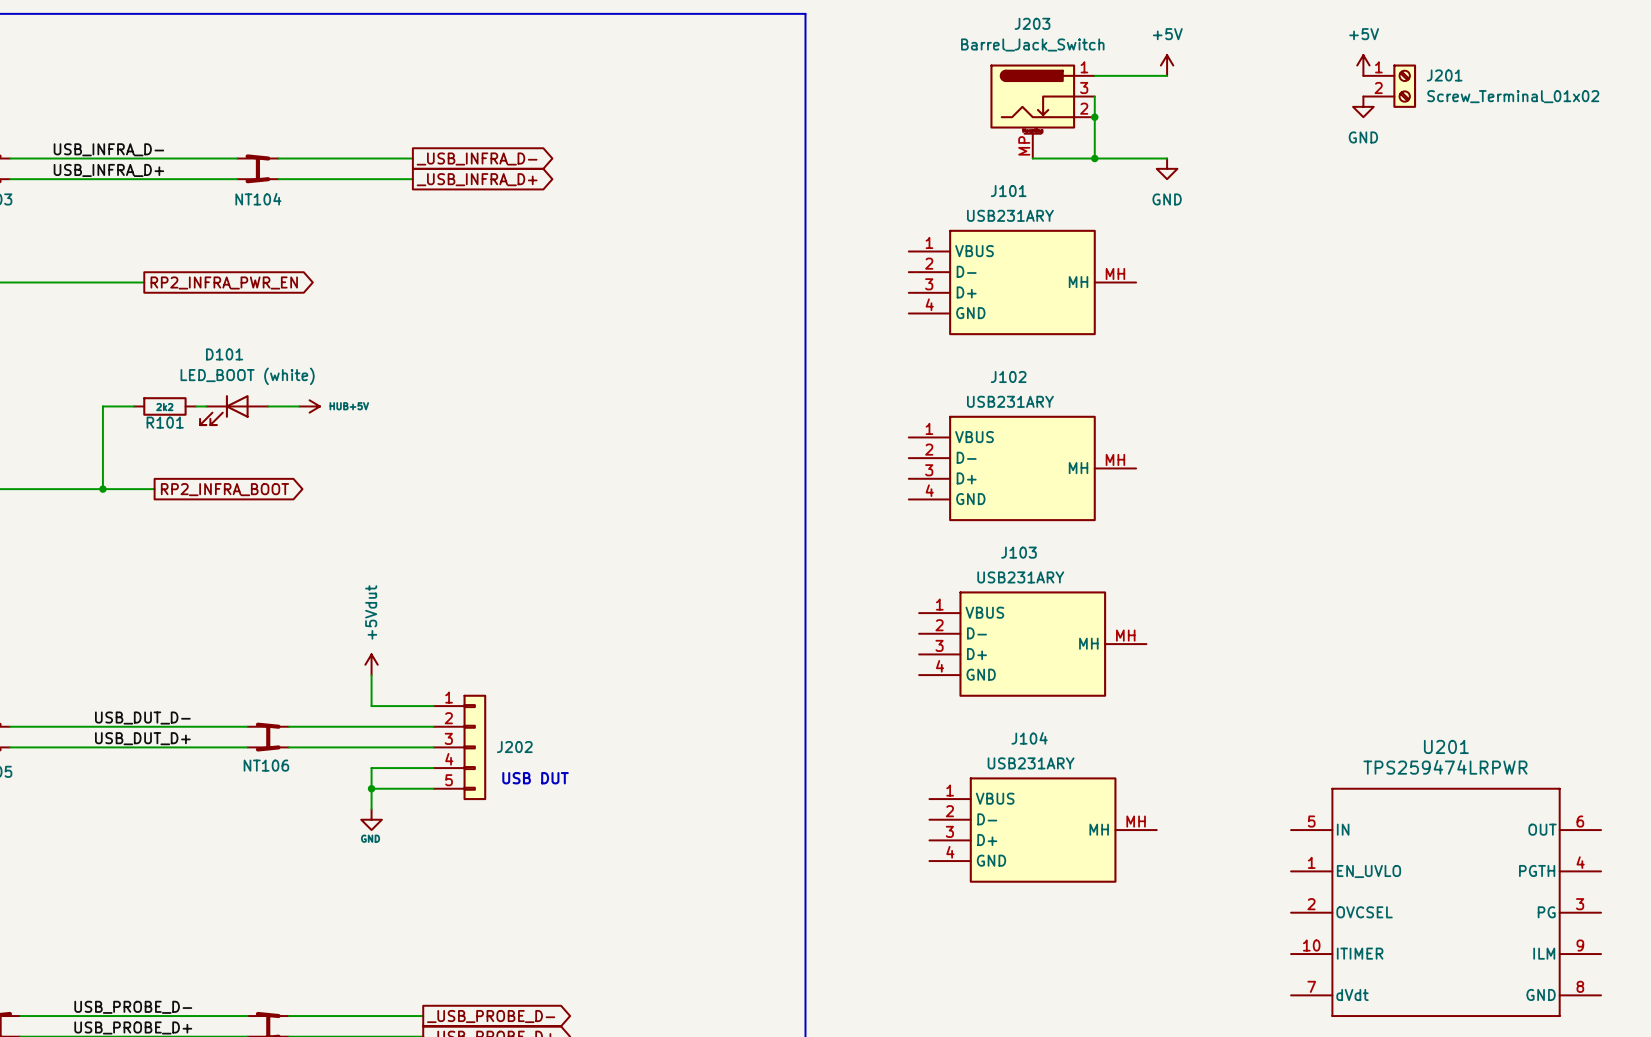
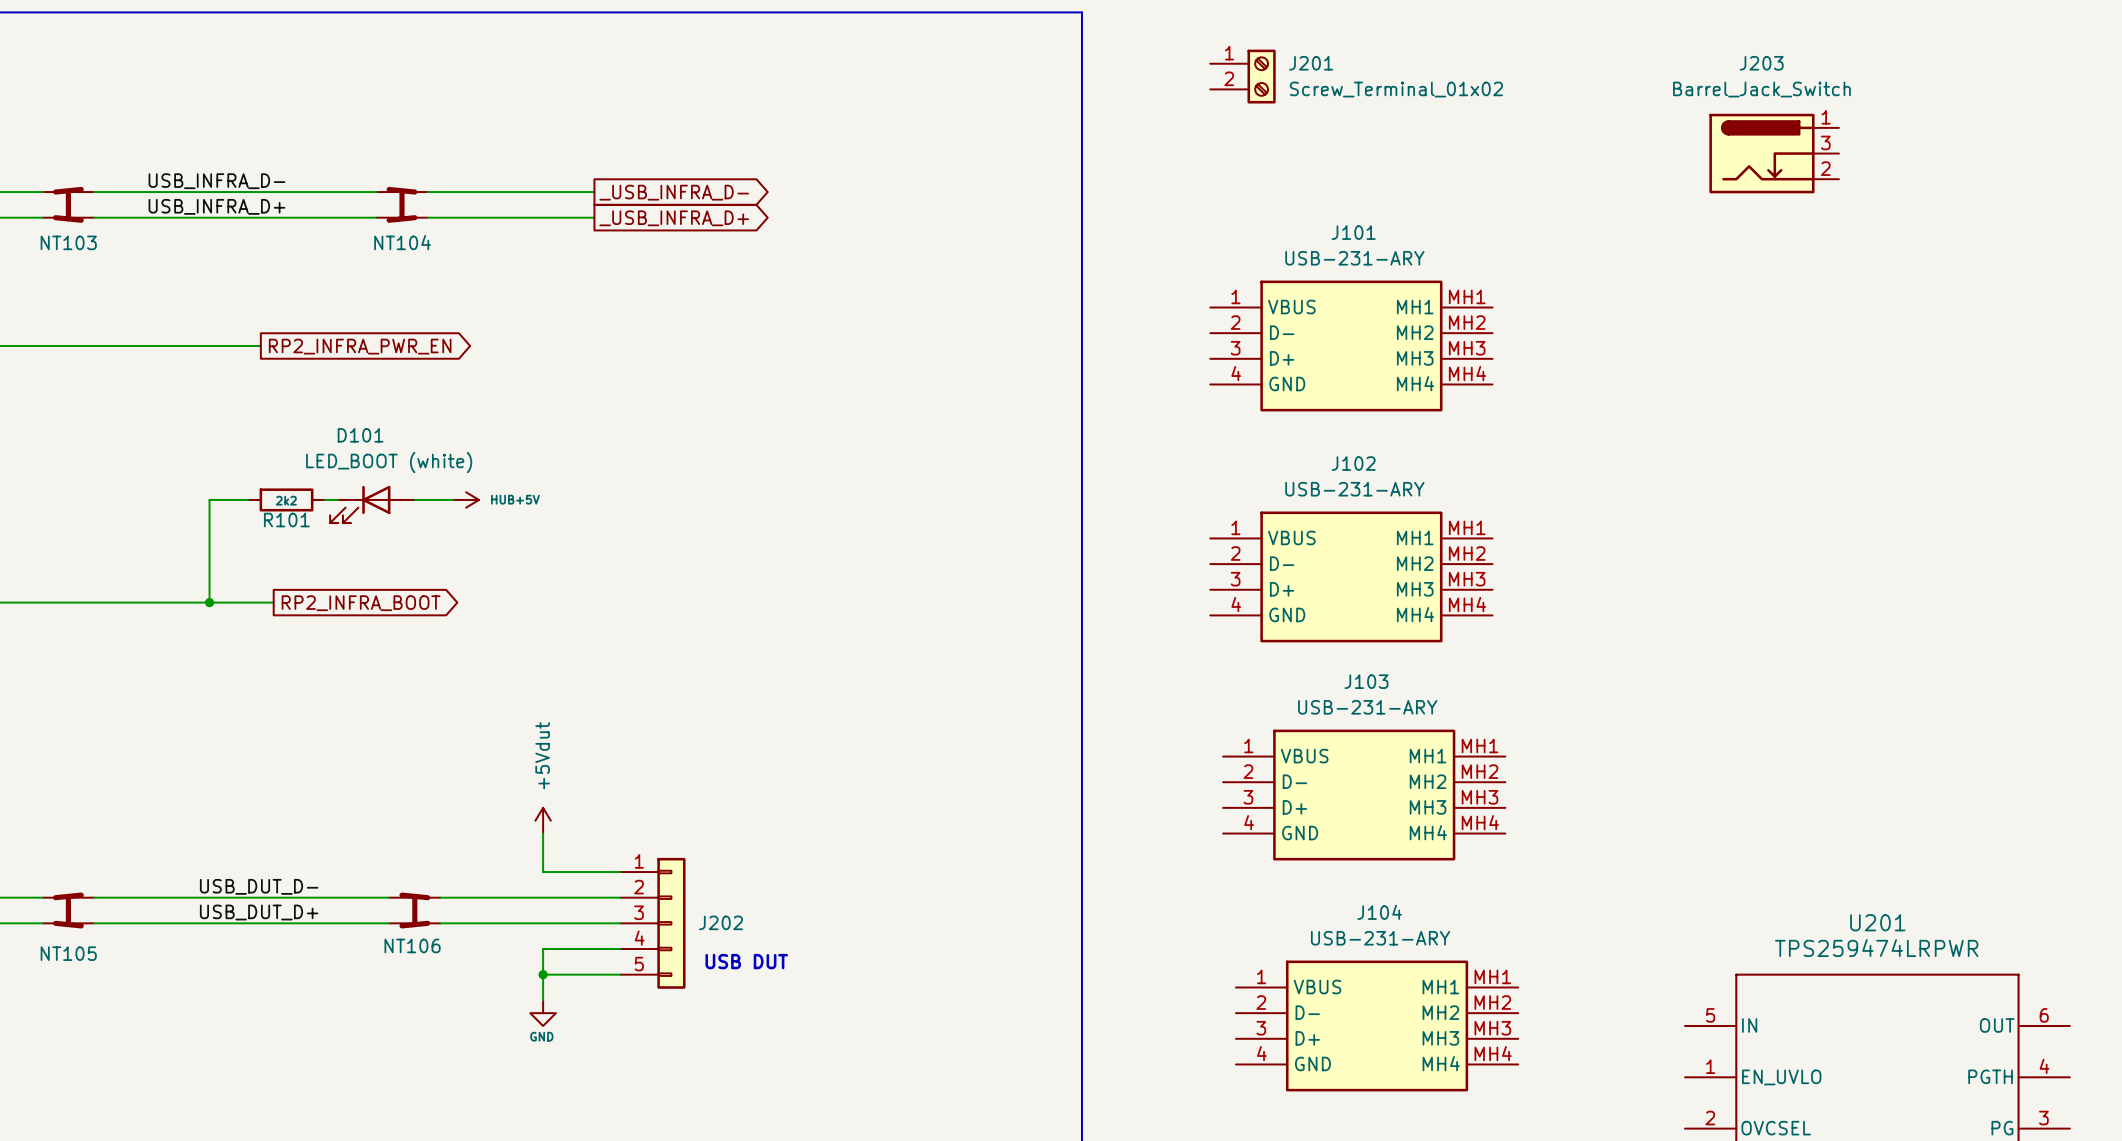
J203 symbol: [990, 64, 1095, 159] -> [1709, 113, 1839, 194]
power symbol: +5V (1167, 65) -> none
power symbol: +5V (1363, 65) -> none
wire: (1094, 75) (1167, 75) -> none
J201 position: (1389, 86) -> (1242, 76)
wire: (1094, 96) (1094, 158) -> none
power symbol: GND (1363, 106) -> none
junction: (1094, 117) -> none
wire: (1032, 158) (1167, 158) -> none
junction: (1094, 158) -> none
power symbol: GND (1167, 168) -> none
J101 value: USB231ARY (1010, 215) -> USB-231-ARY (1354, 258)
J101 symbol: [908, 229, 1137, 336] -> [1210, 280, 1493, 412]
J102 value: USB231ARY (1010, 401) -> USB-231-ARY (1354, 489)
J102 symbol: [908, 415, 1137, 522] -> [1210, 511, 1493, 643]
J103 value: USB231ARY (1020, 577) -> USB-231-ARY (1367, 707)
J103 symbol: [919, 591, 1147, 697] -> [1223, 729, 1506, 861]
J104 value: USB231ARY (1031, 763) -> USB-231-ARY (1380, 938)
J104 symbol: [929, 777, 1157, 883] -> [1235, 960, 1519, 1092]

